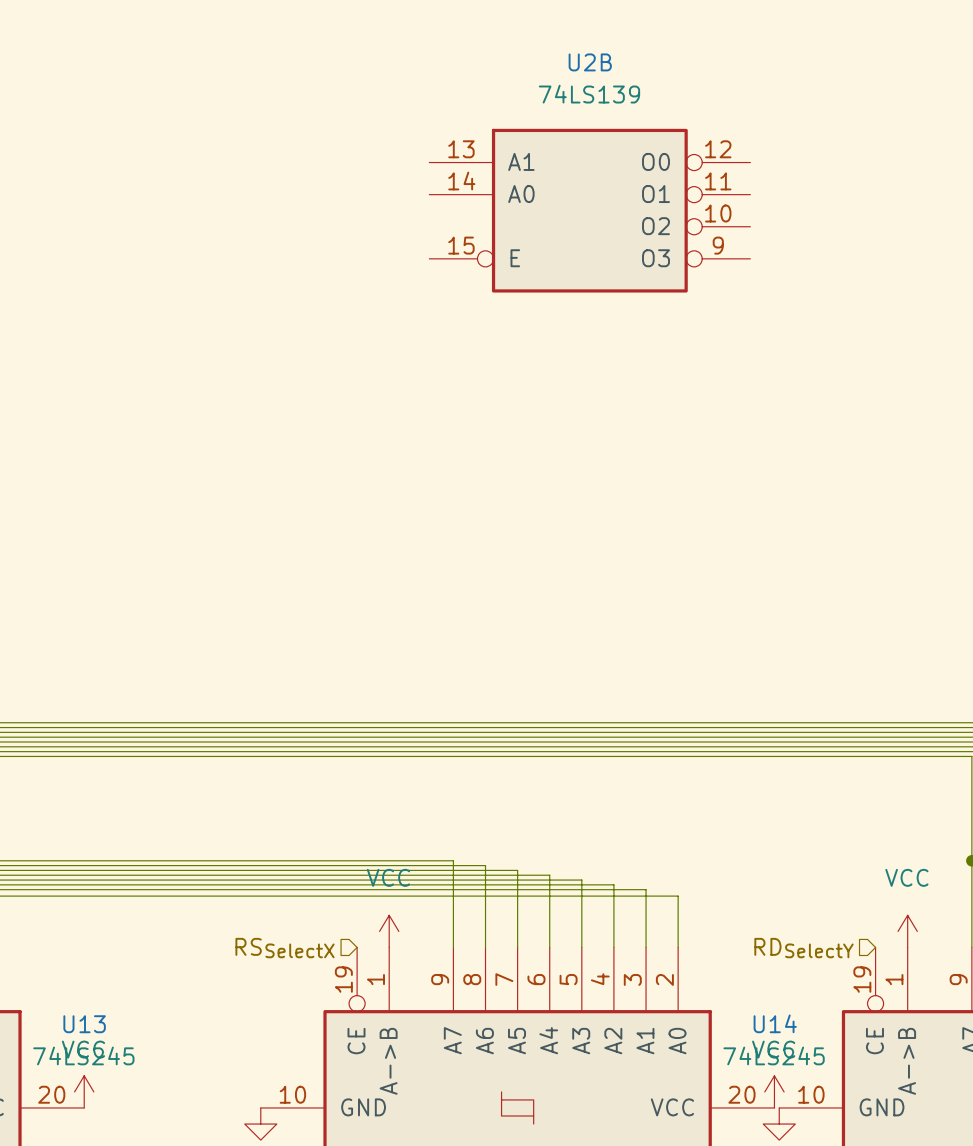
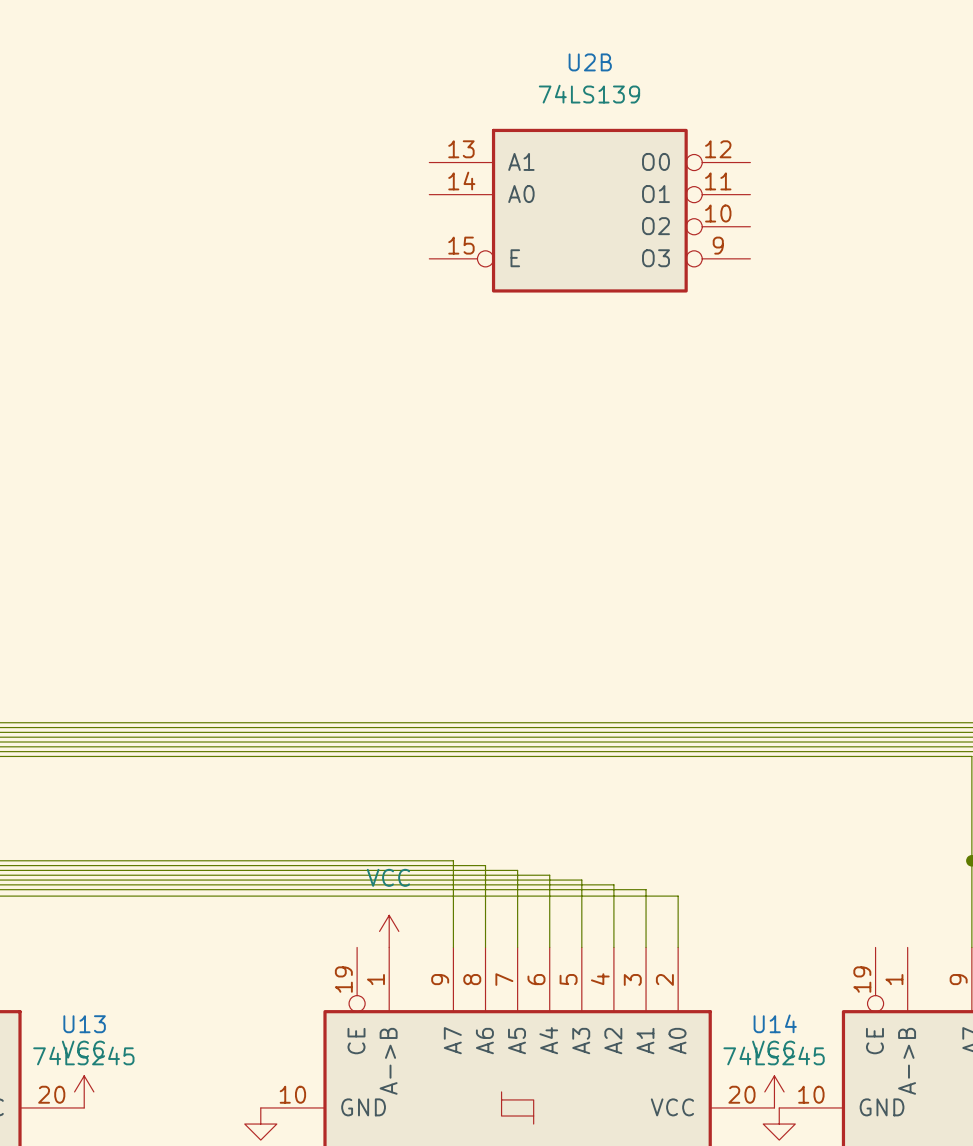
power symbol: VCC (907, 931) -> none
hierarchical label: RSSelectX (285, 948) -> none
hierarchical label: RDSelectY (804, 948) -> none

